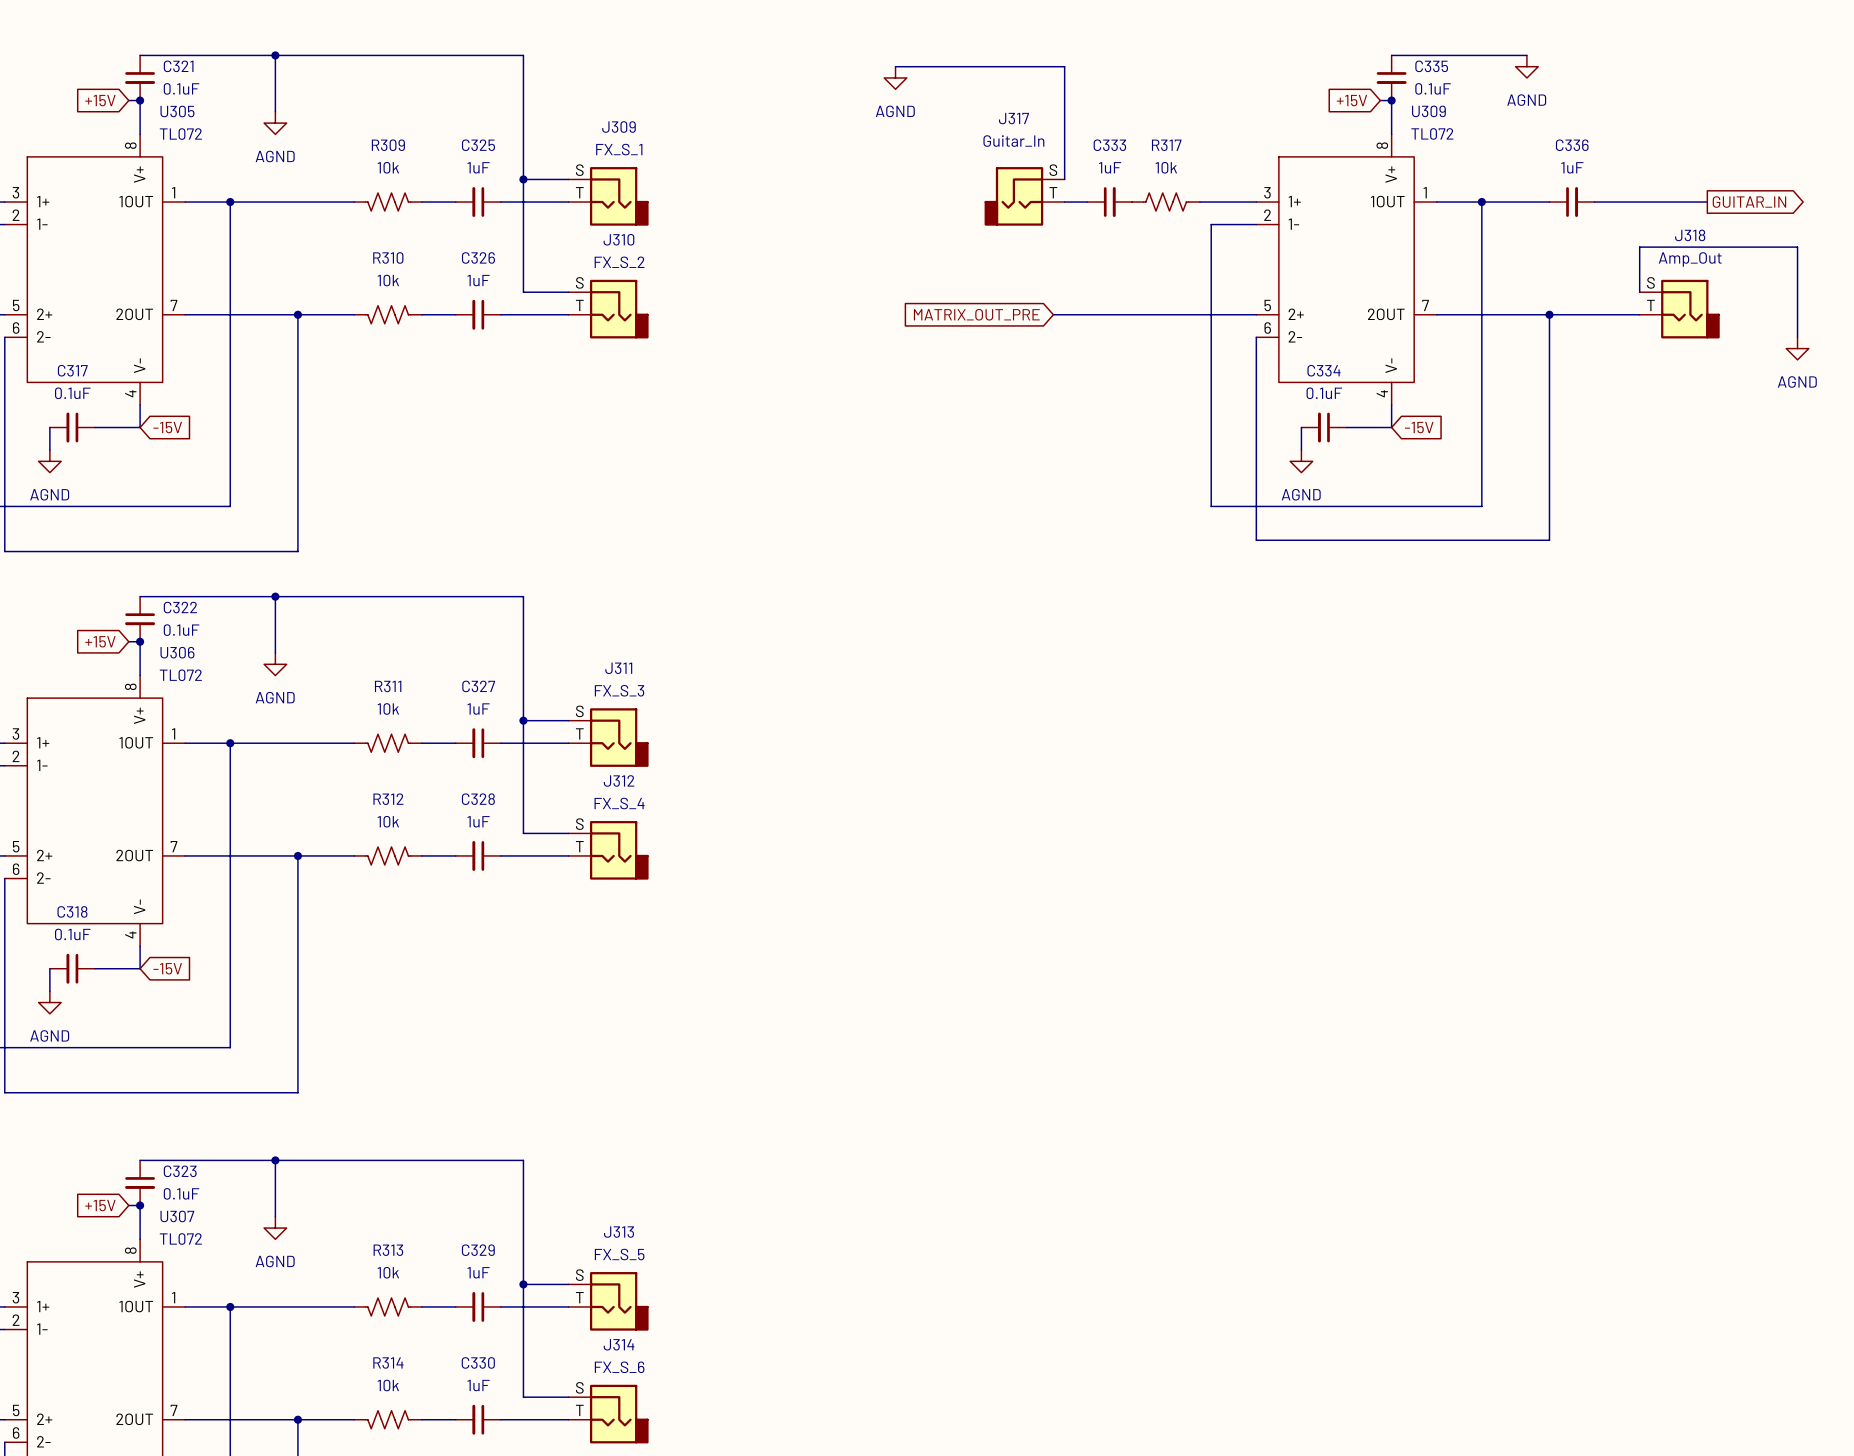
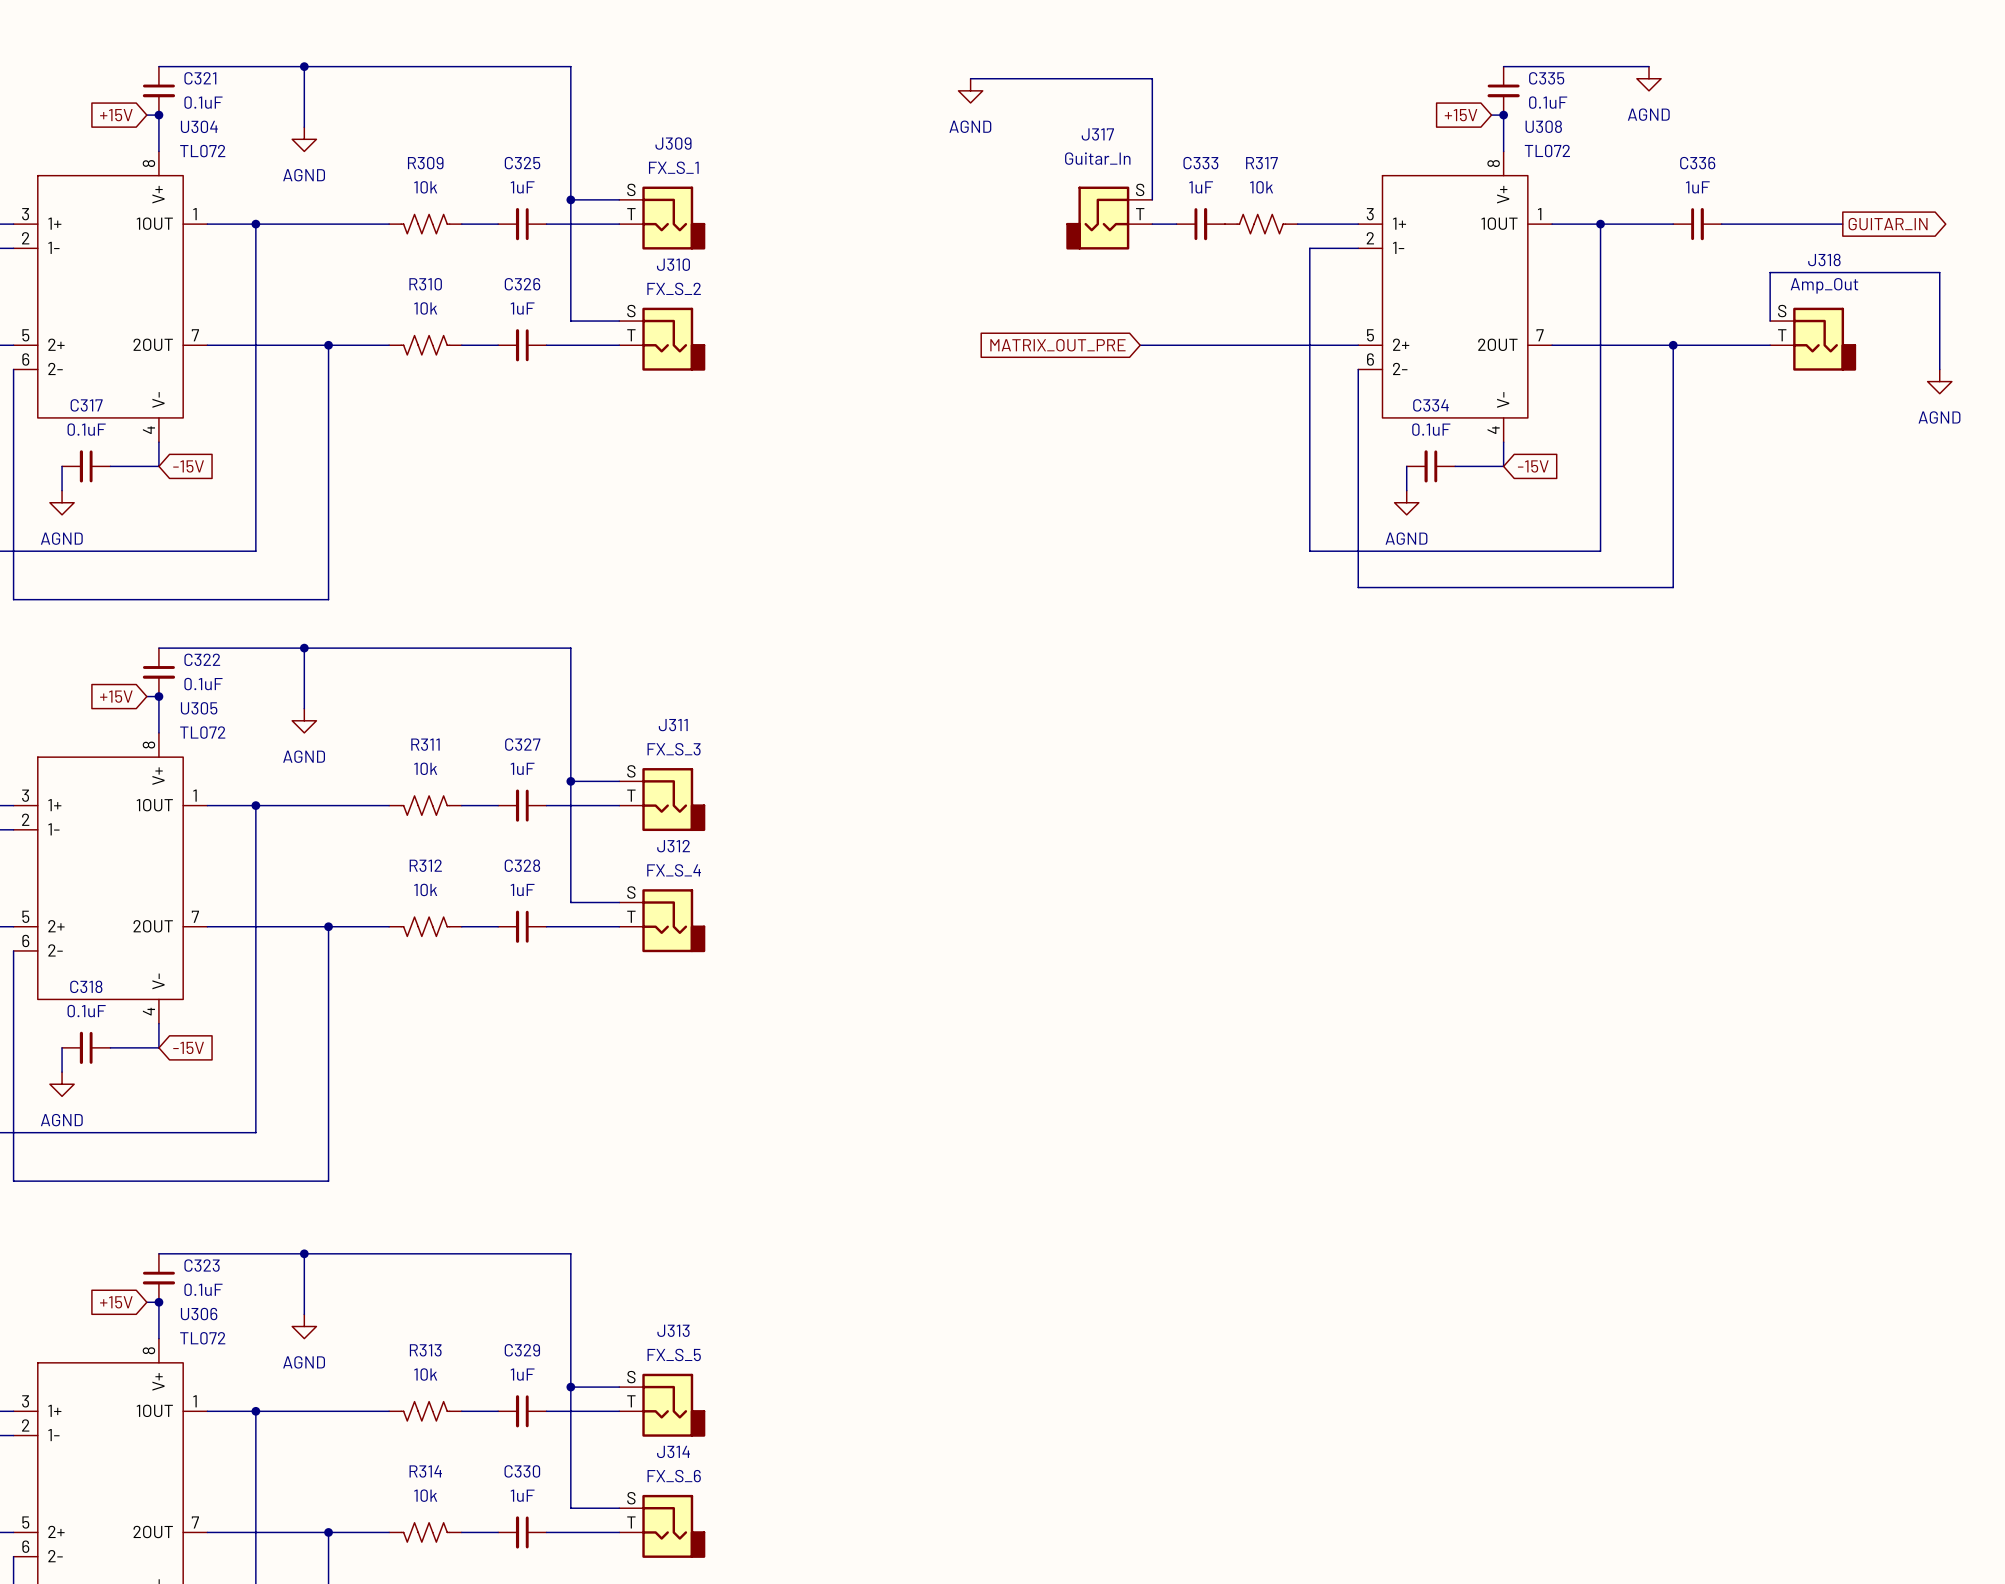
U305 name: U305 (177, 111) -> U304 (199, 126)
U309 name: U309 (1428, 111) -> U308 (1543, 126)
U306 name: U306 (177, 652) -> U305 (199, 708)
U307 name: U307 (177, 1216) -> U306 (199, 1314)

